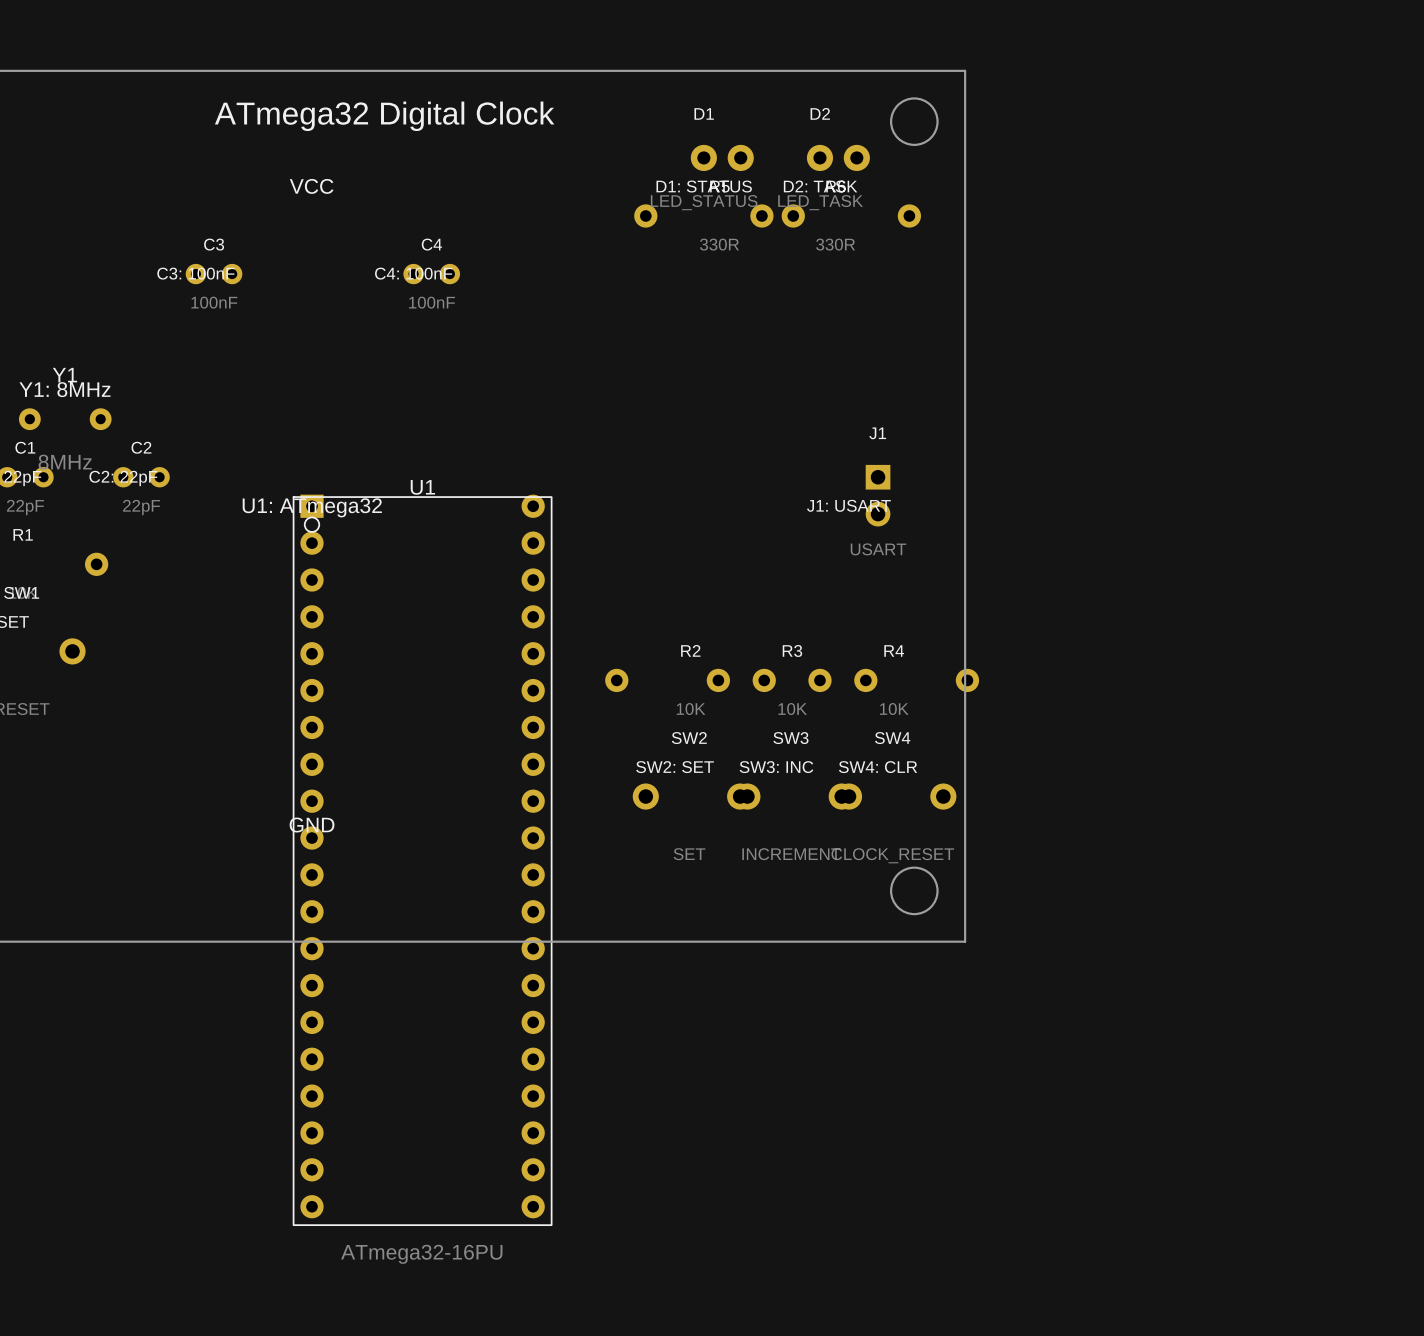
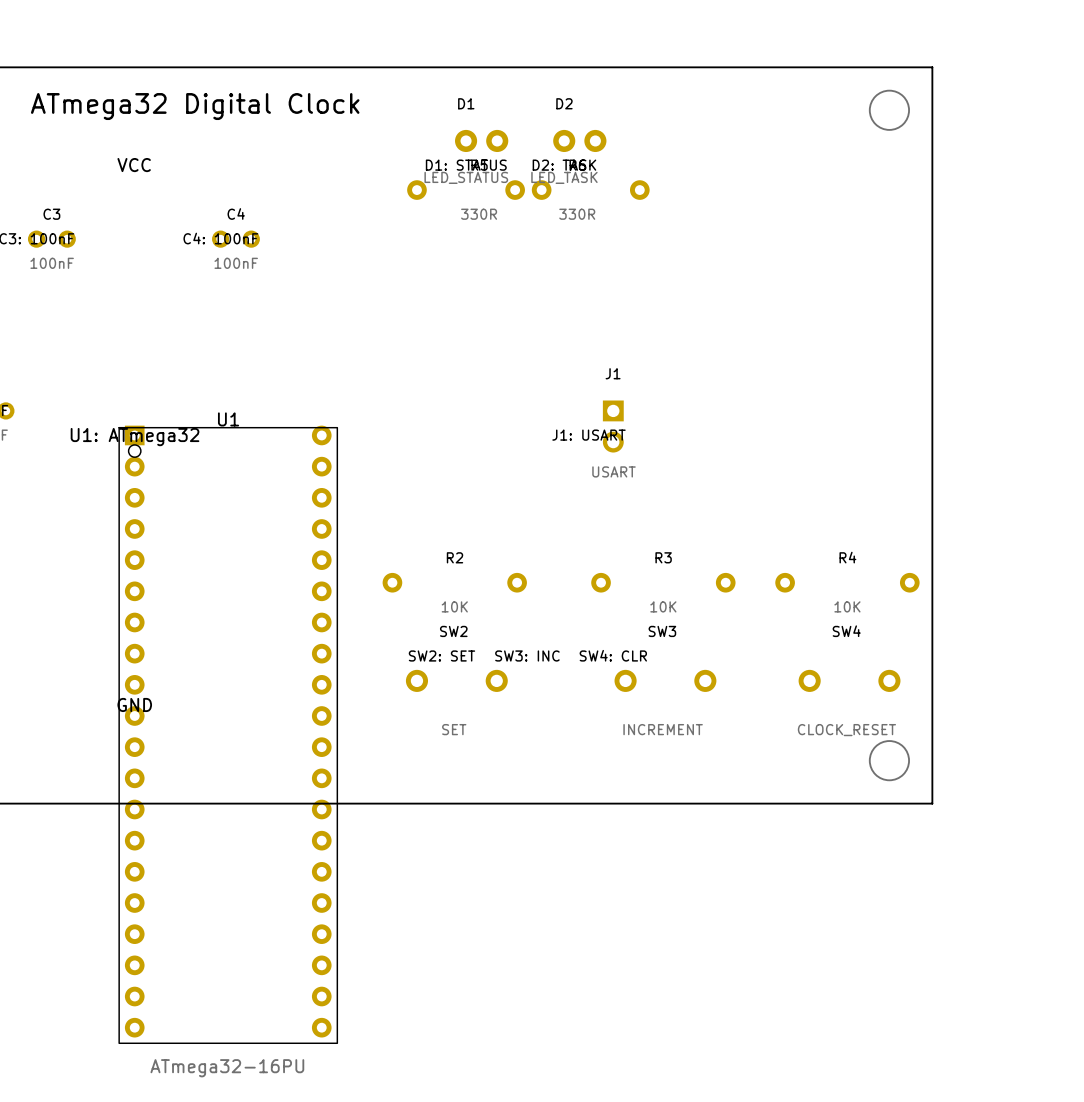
board edge: (965, 70) (965, 941) -> (686, 67) (932, 67) (932, 803) (686, 803)
round board edge: [890, 97, 939, 146] -> none
drawing: none -> [868, 89, 910, 131]
R3 position: (792, 680) -> (663, 582)
R4 position: (893, 680) -> (847, 582)
SW3 position: (794, 796) -> (665, 680)
SW4 position: (896, 796) -> (849, 680)
round board edge: [890, 866, 939, 916] -> none
drawing: none -> [868, 740, 910, 782]

